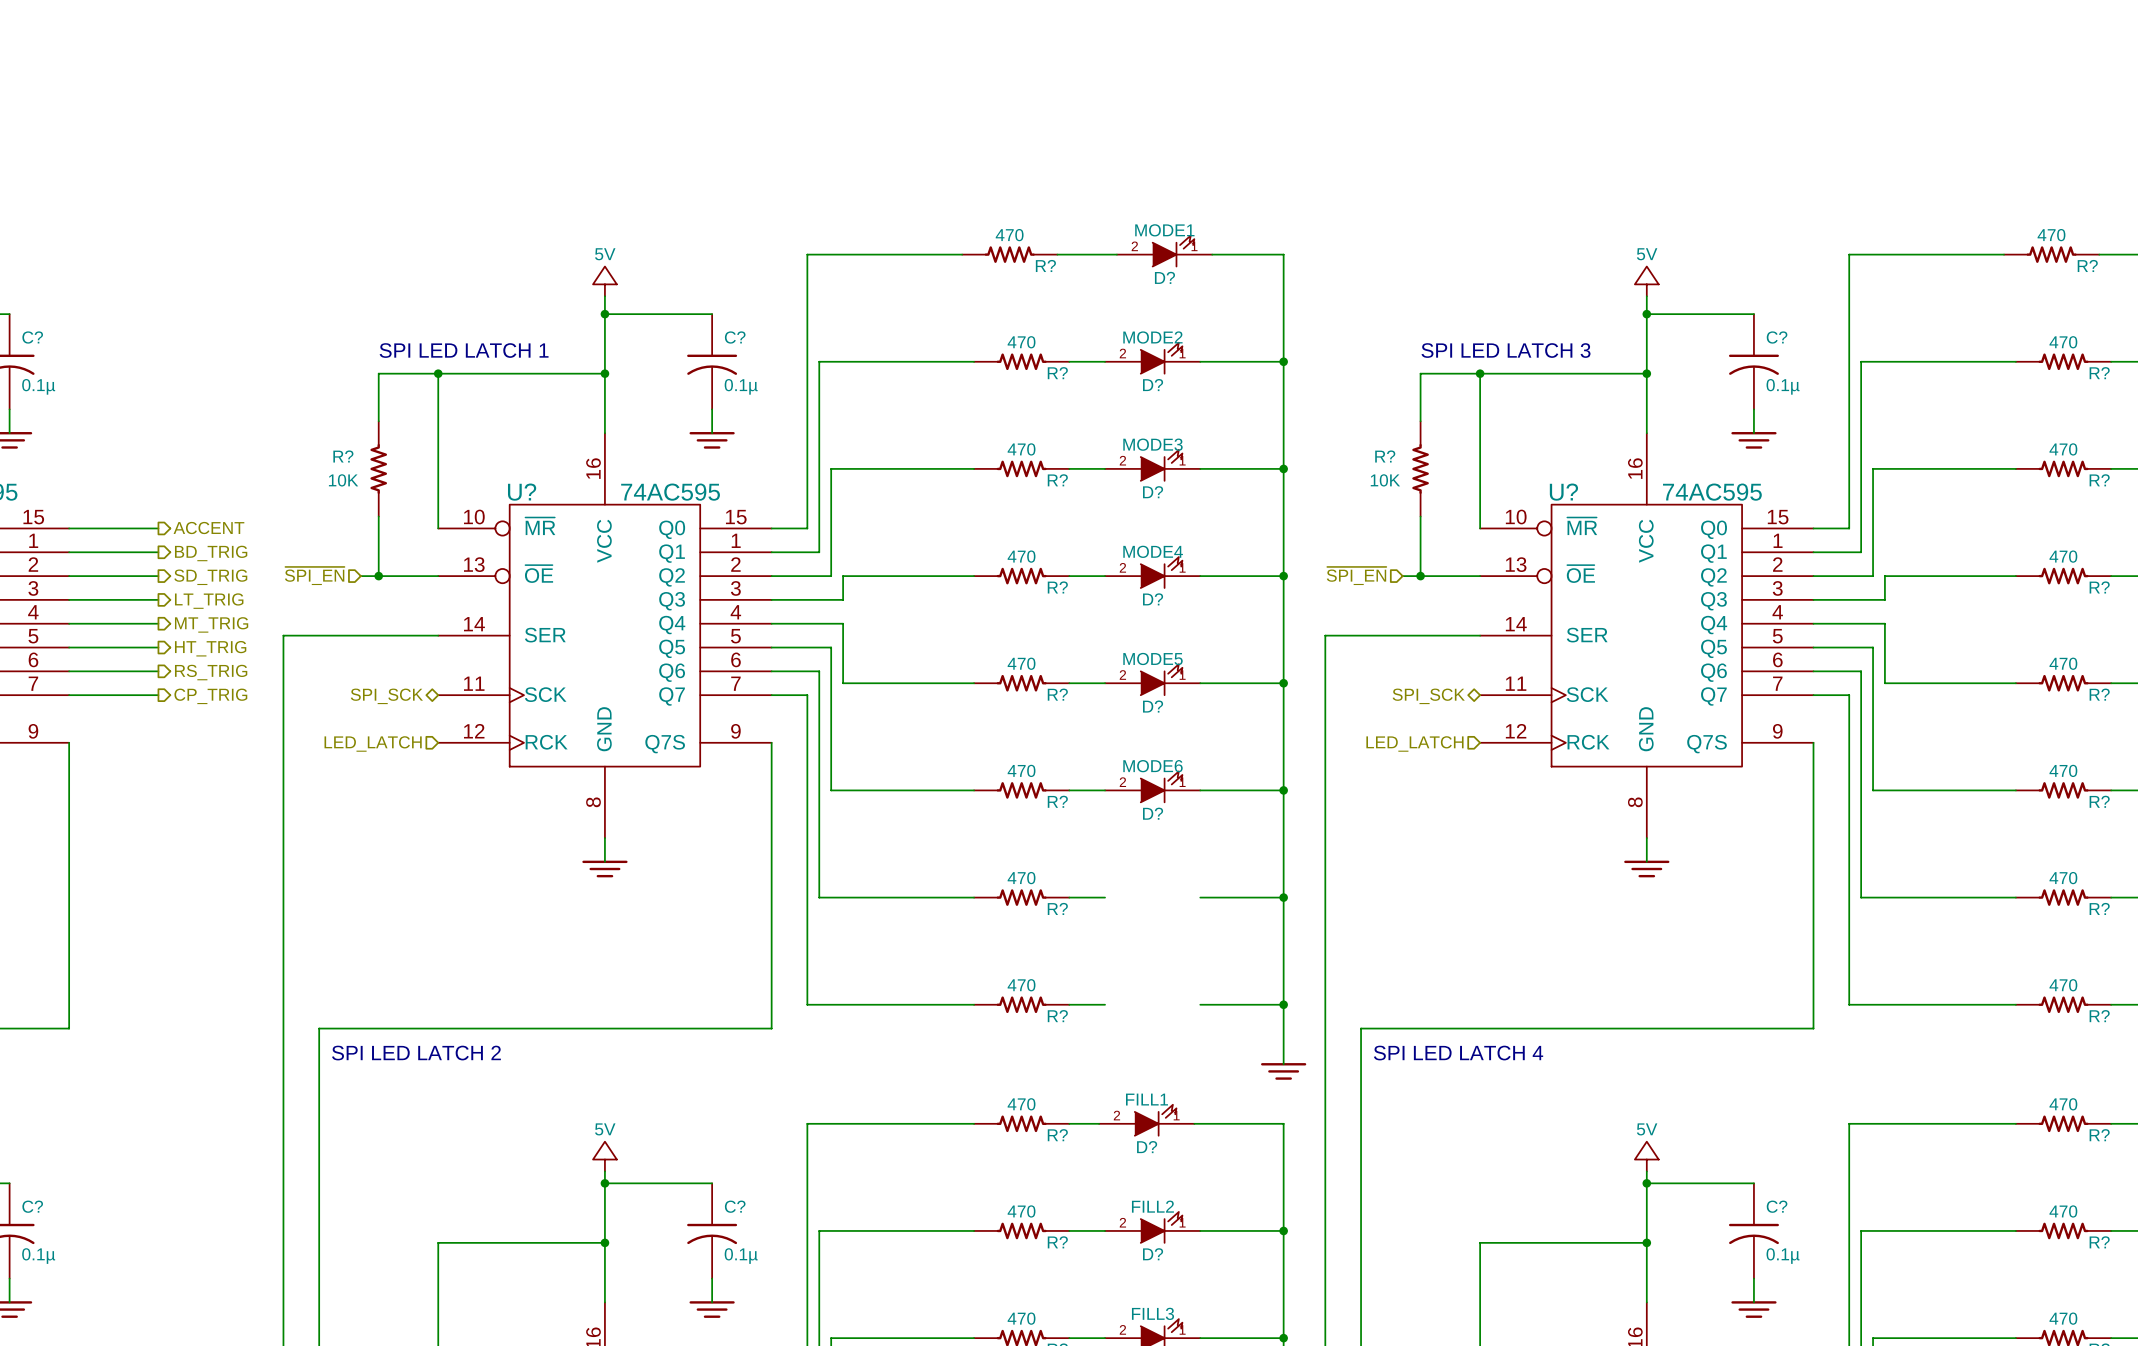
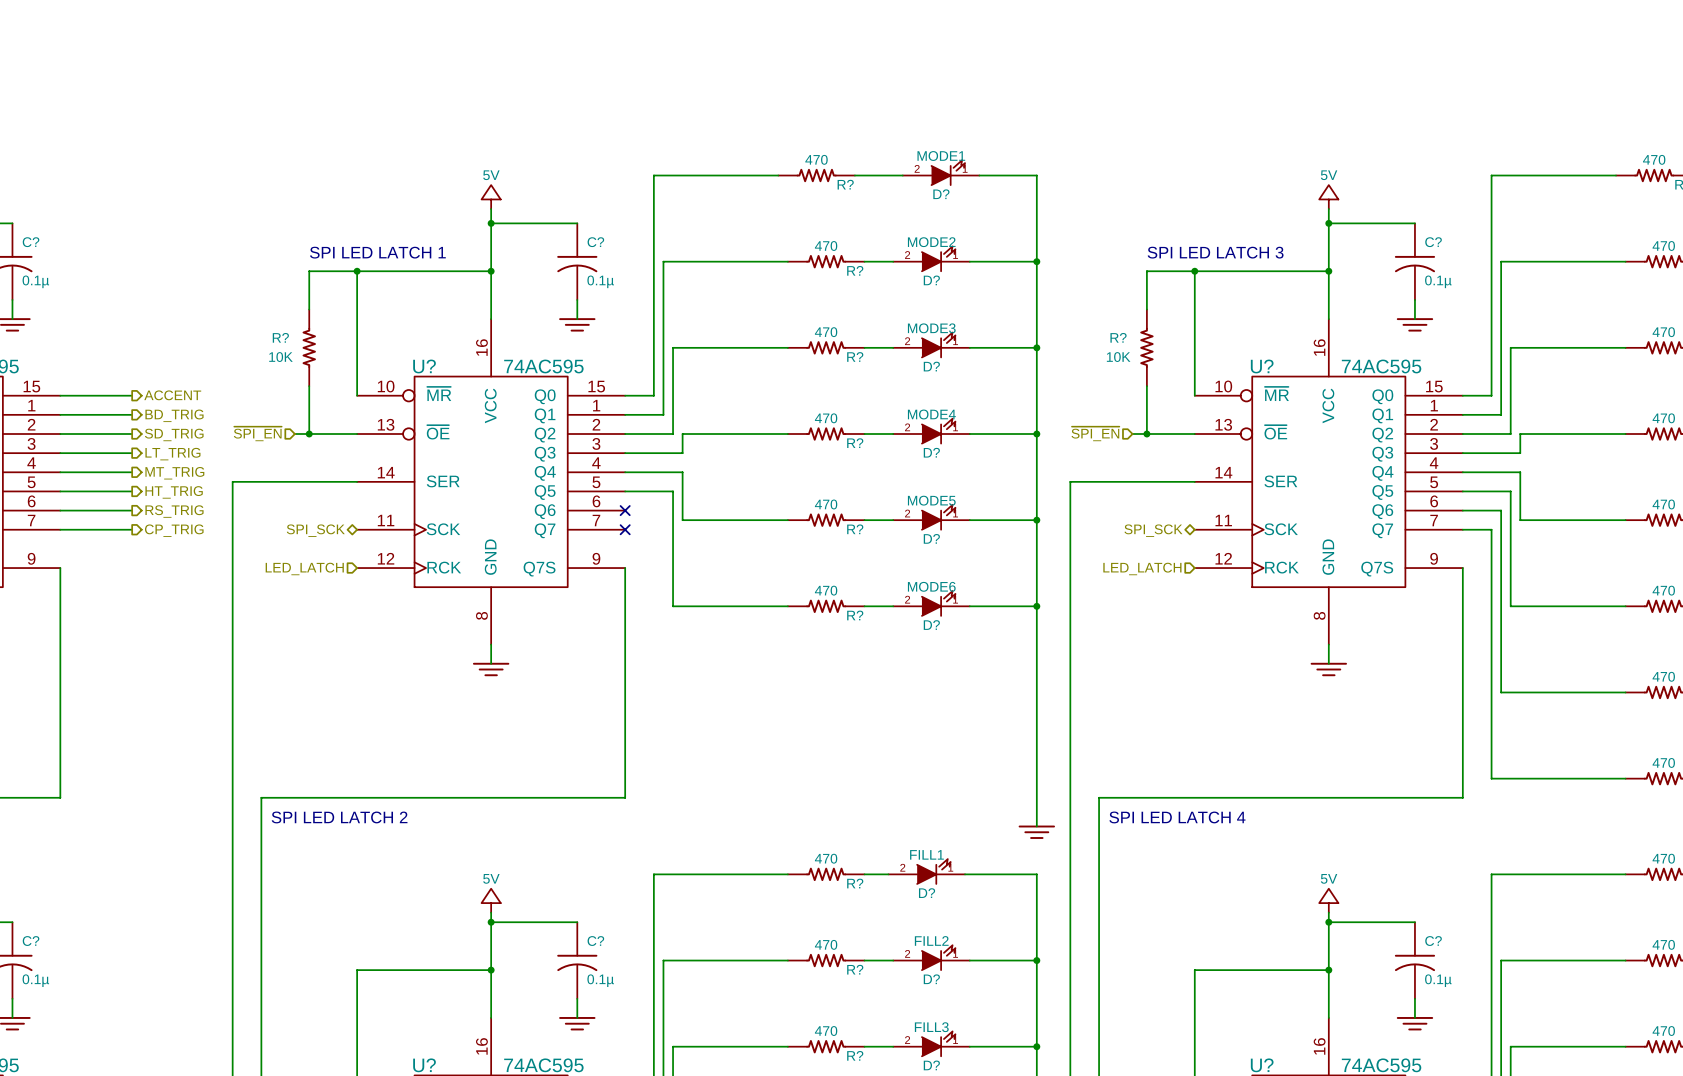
wire: (771, 671) (819, 671) (819, 897) (974, 897) -> none
no-connect mark: none -> (625, 510)
wire: (771, 695) (807, 695) (807, 1004) (974, 1004) -> none
no-connect mark: none -> (625, 529)
R?: 470 (1021, 897) -> none
wire: (1069, 897) (1105, 897) -> none
wire: (1200, 897) (1283, 897) -> none
junction: (1283, 897) -> none
R?: 470 (1021, 1004) -> none
wire: (1069, 1004) (1105, 1004) -> none
wire: (1200, 1004) (1283, 1004) -> none
junction: (1283, 1004) -> none

